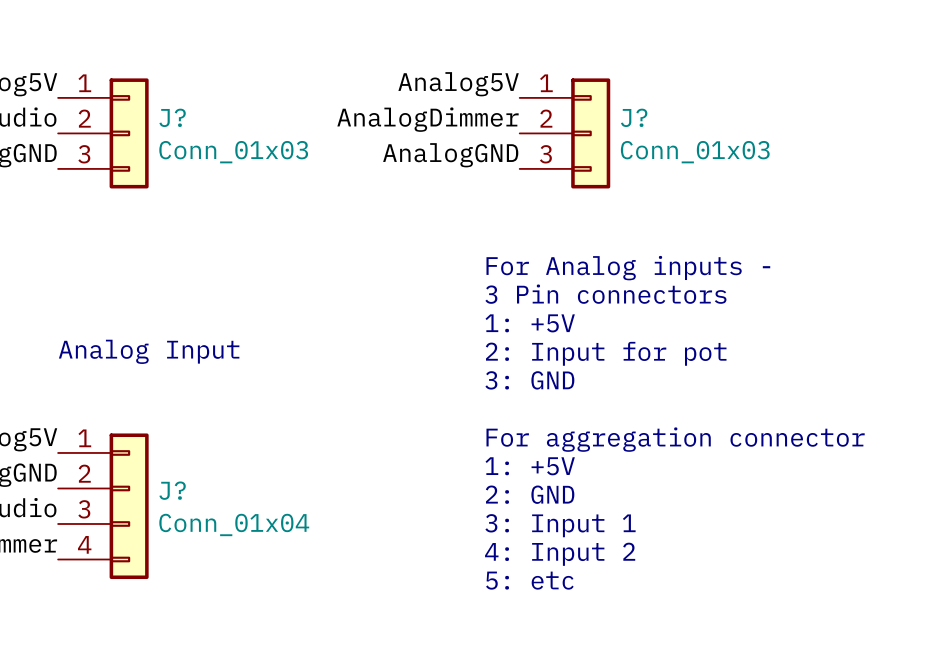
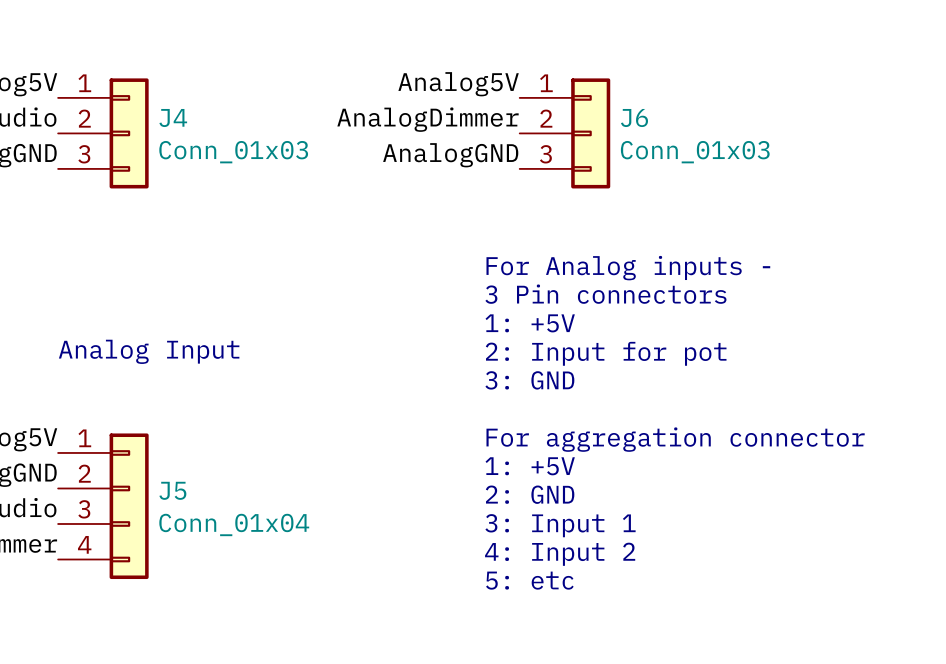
J? name: J? (172, 117) -> J4 (173, 118)
J? name: J? (634, 117) -> J6 (634, 118)
J? name: J? (172, 490) -> J5 (172, 490)

